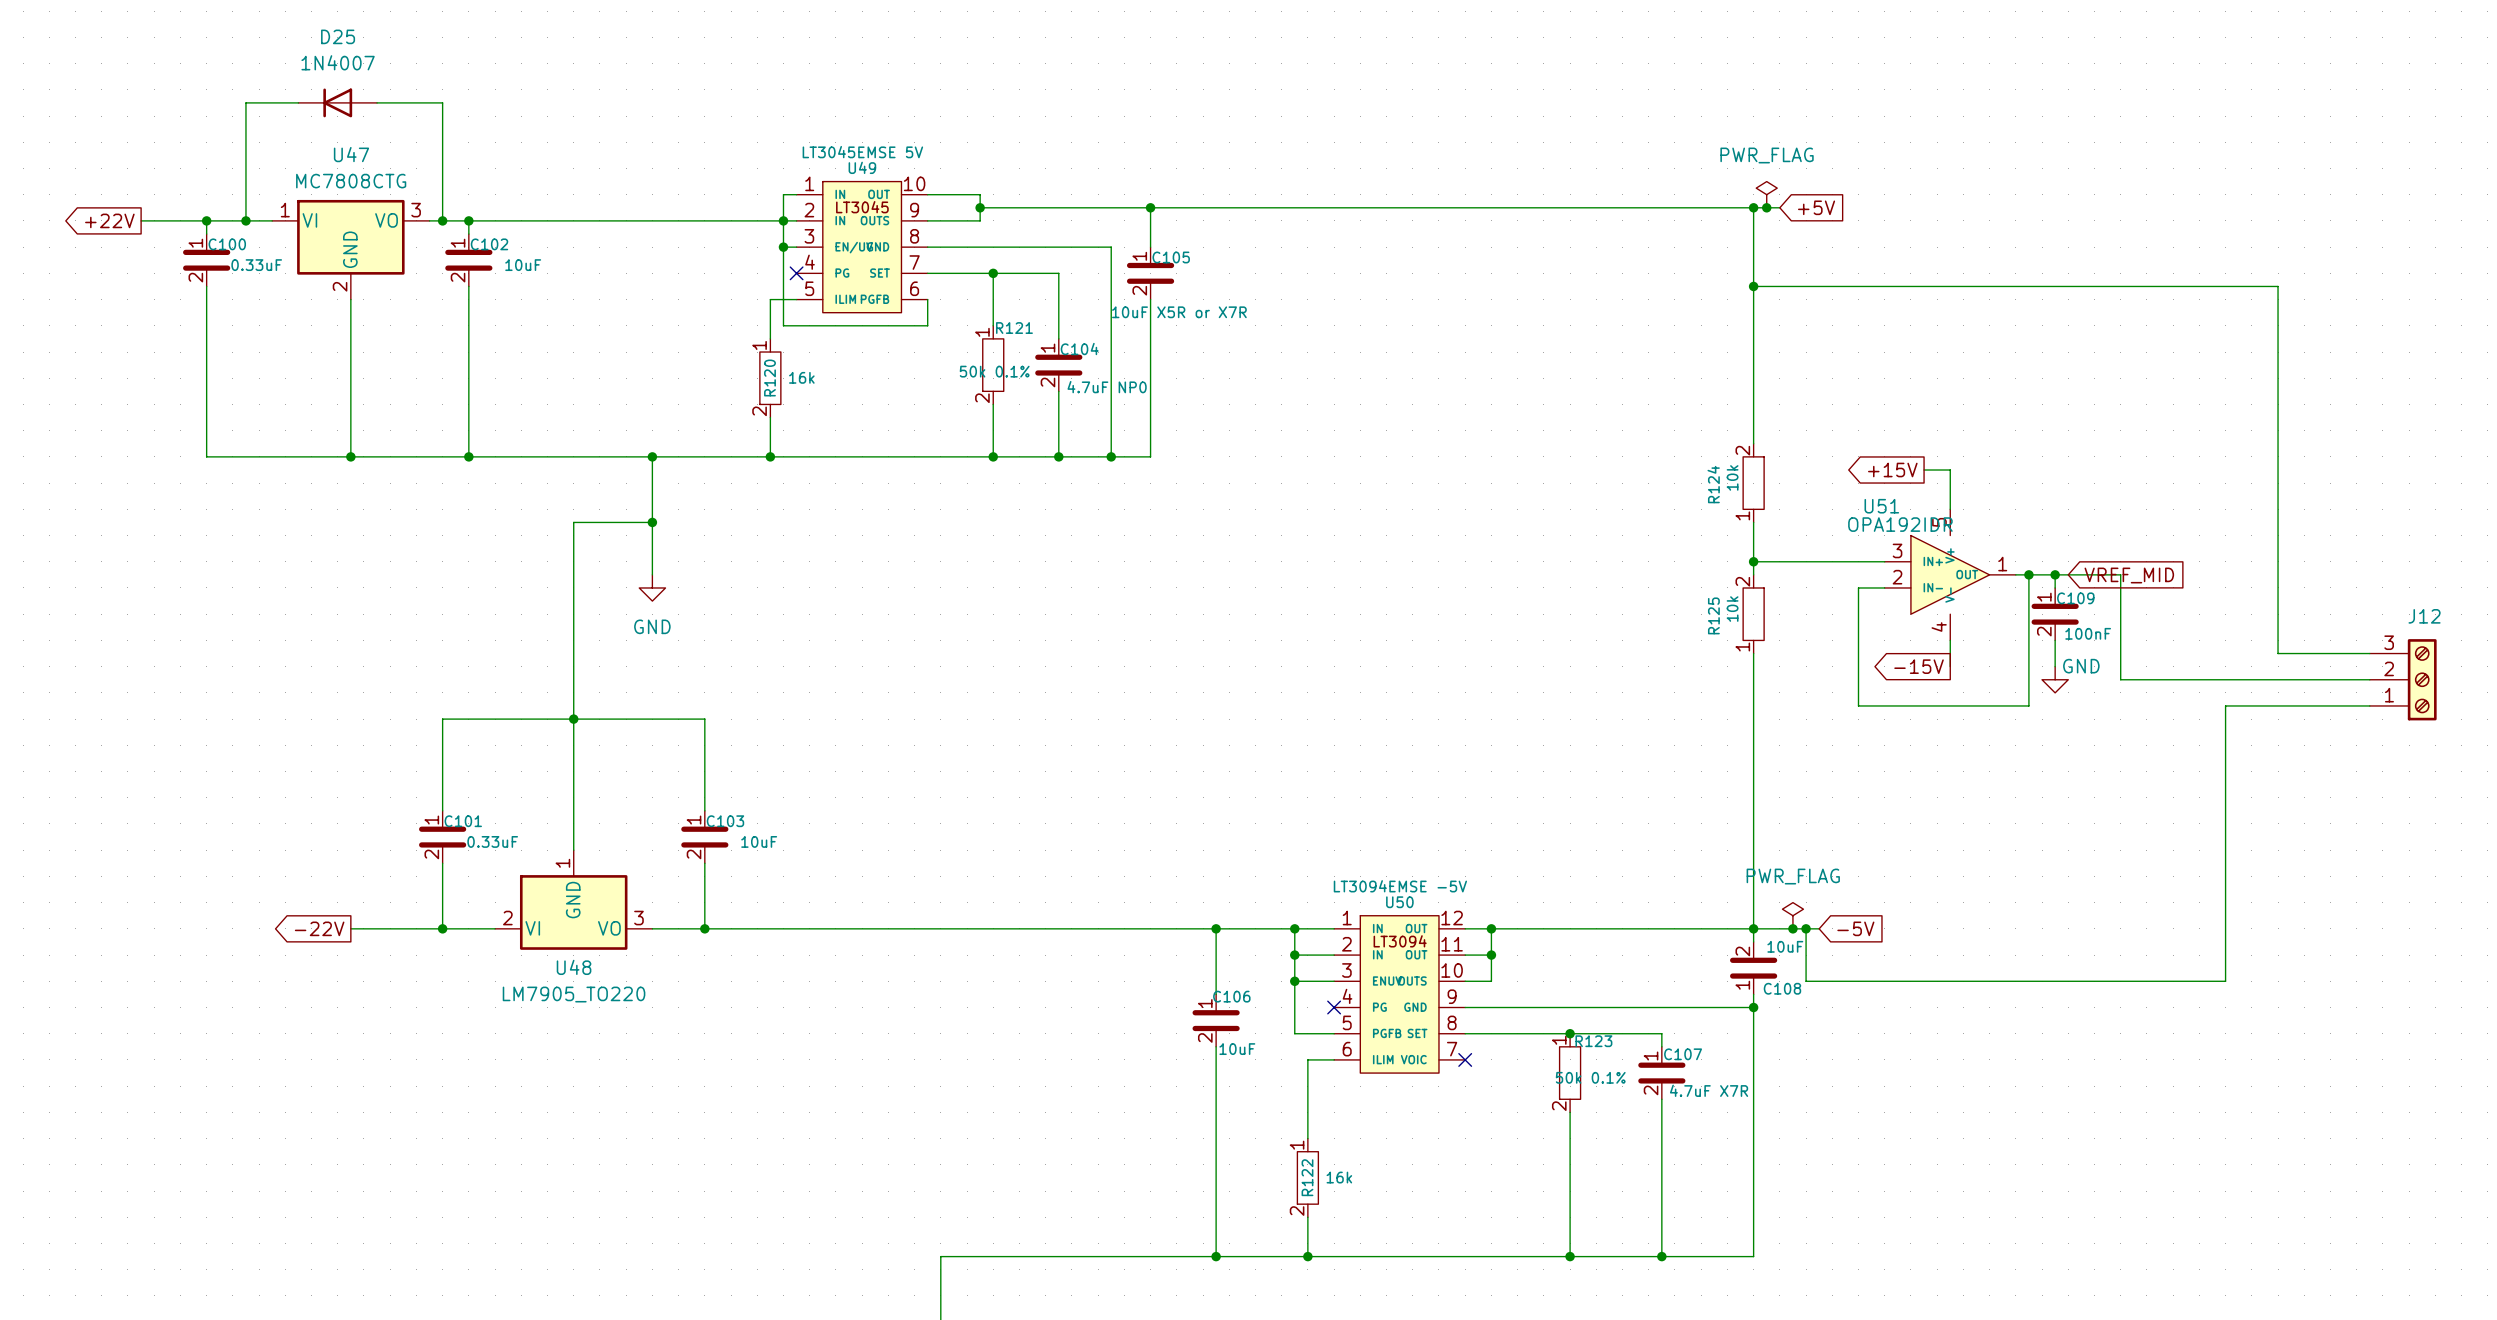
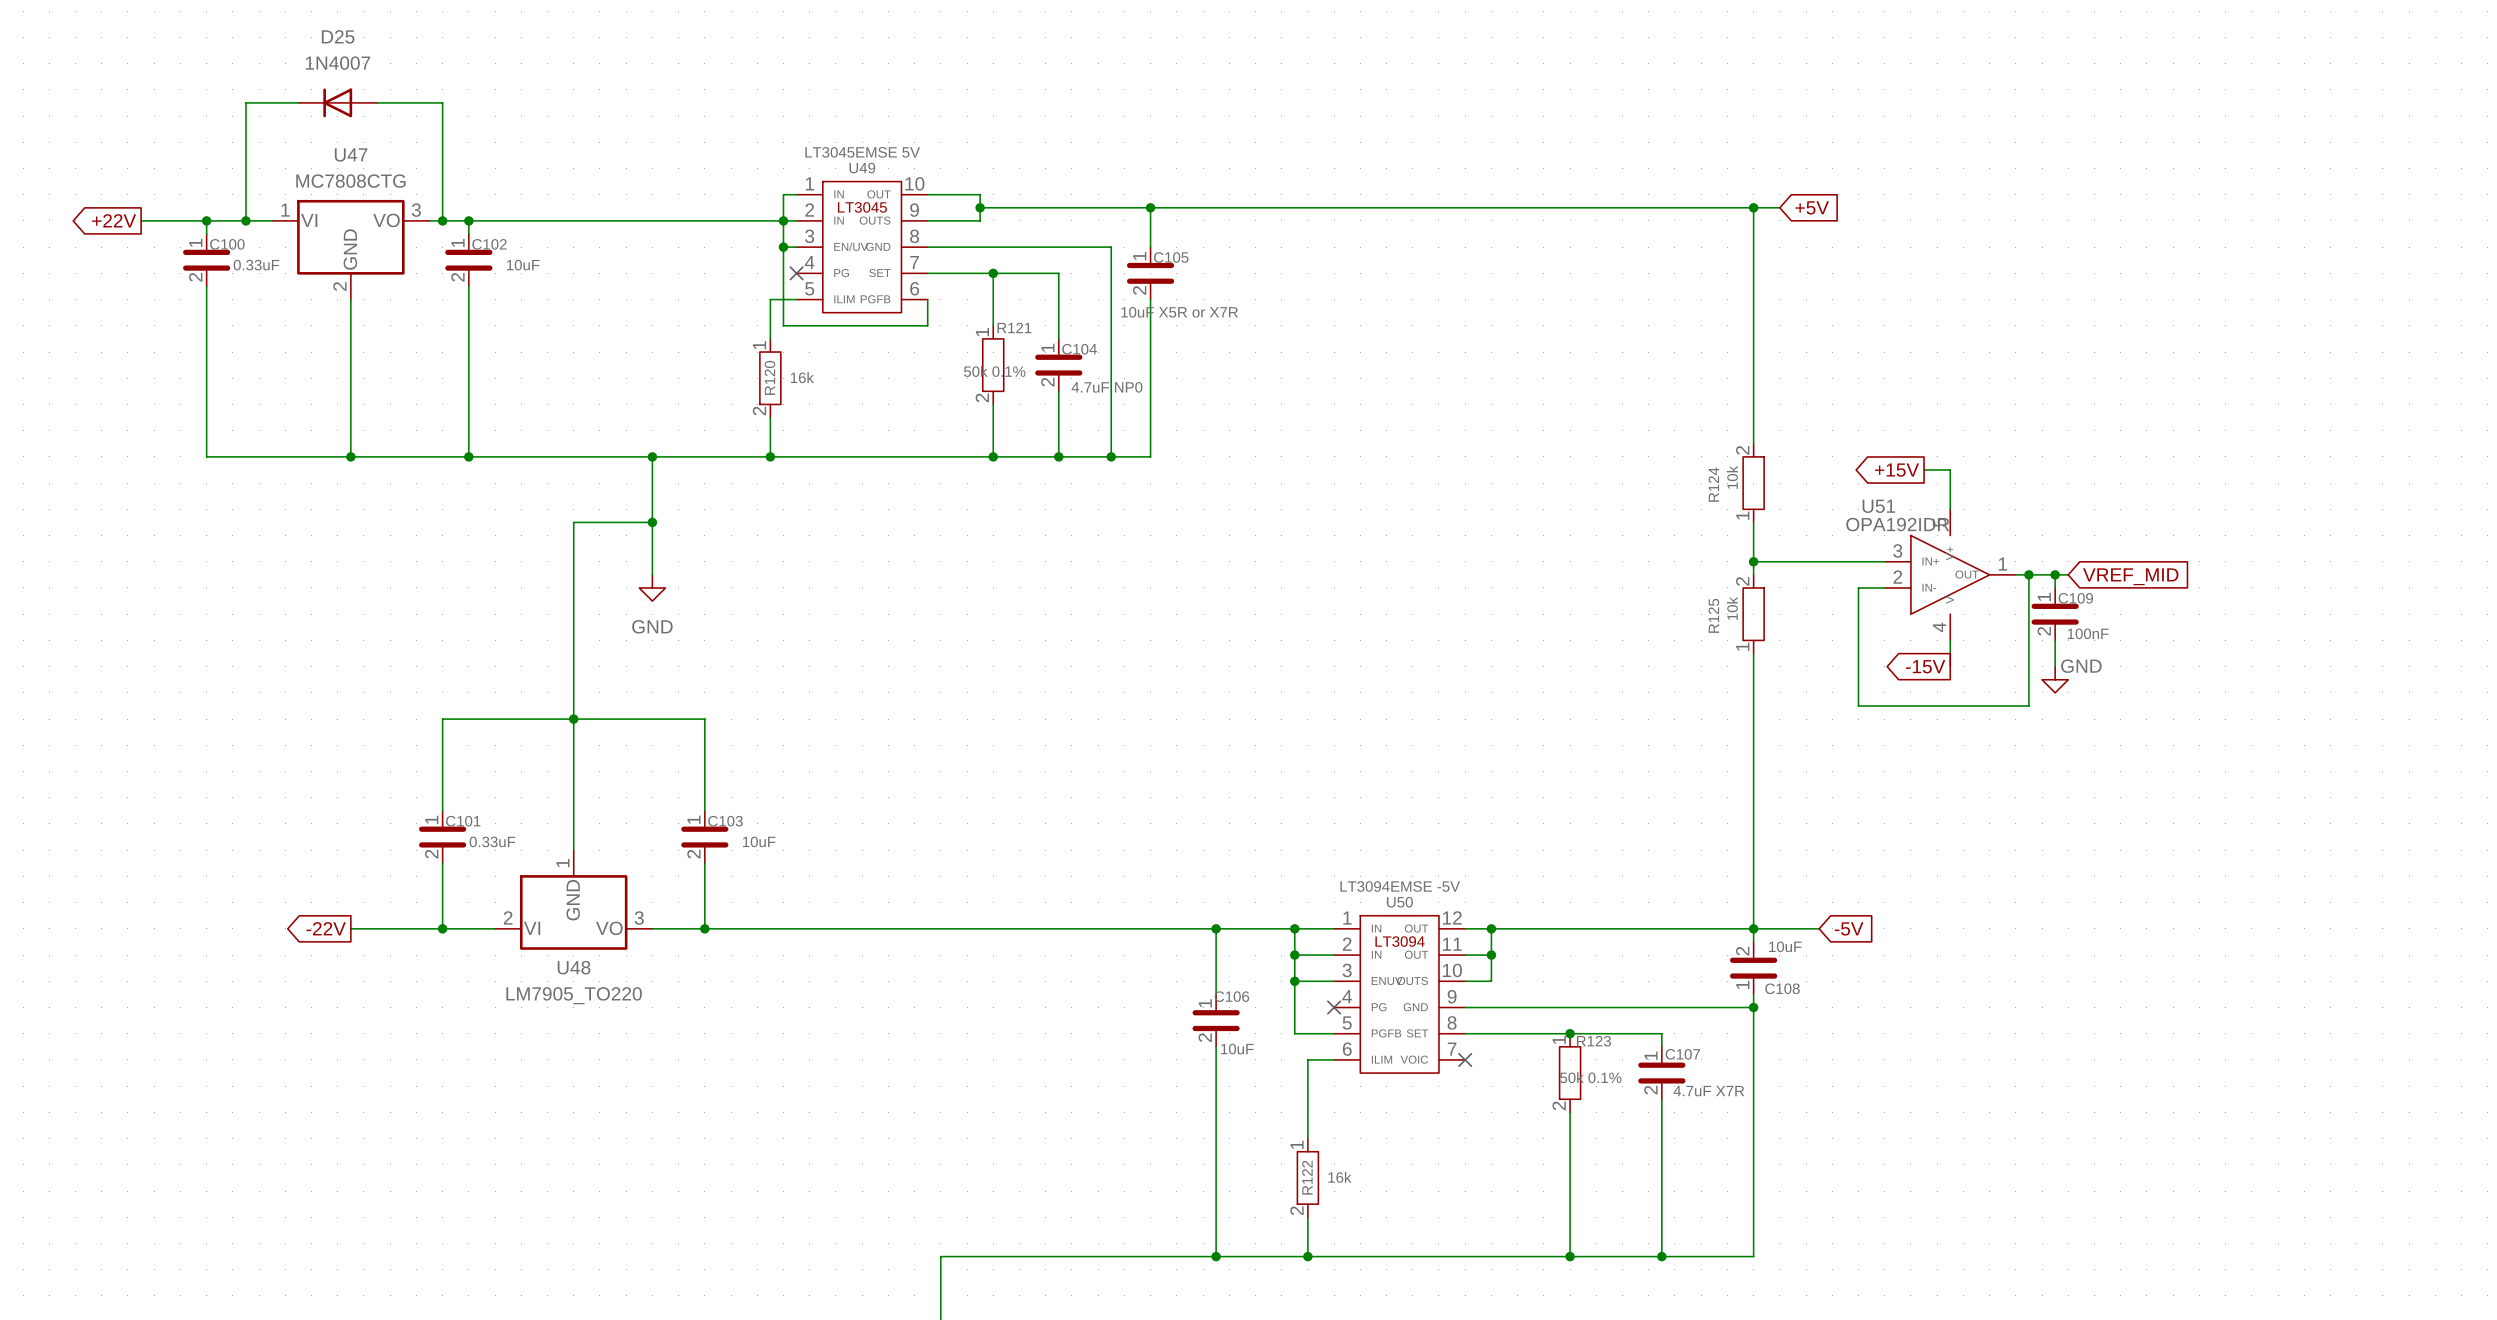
power symbol: PWR_FLAG (1766, 194) -> none
junction: (1766, 207) -> none
wire: (1753, 286) (2278, 286) (2278, 653) (2369, 653) -> none
junction: (1753, 286) -> none
wire: (2068, 574) (2120, 574) (2120, 679) (2369, 679) -> none
J12: (2403, 679) -> none
wire: (2369, 705) (2225, 705) (2225, 981) (1806, 981) (1806, 928) -> none
power symbol: PWR_FLAG (1792, 915) -> none
junction: (1792, 928) -> none
junction: (1806, 928) -> none

